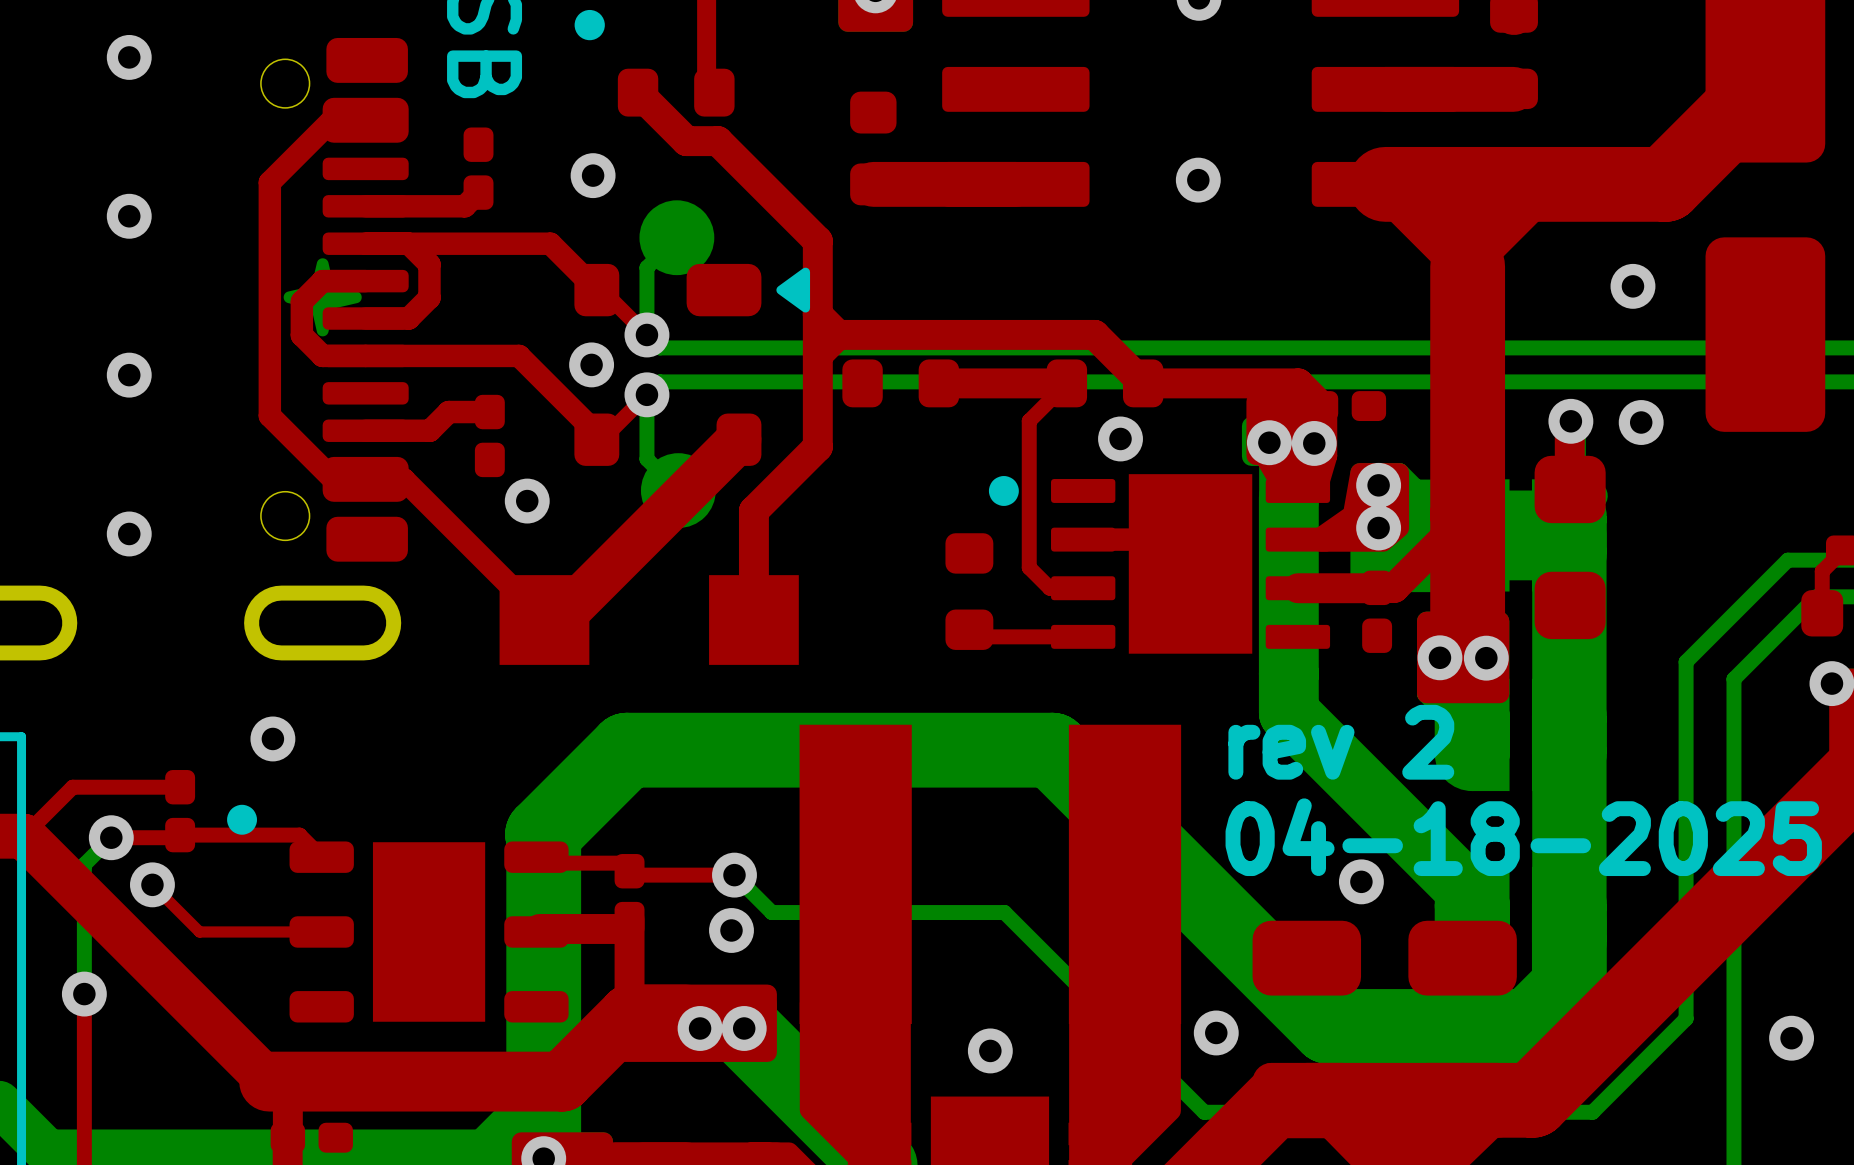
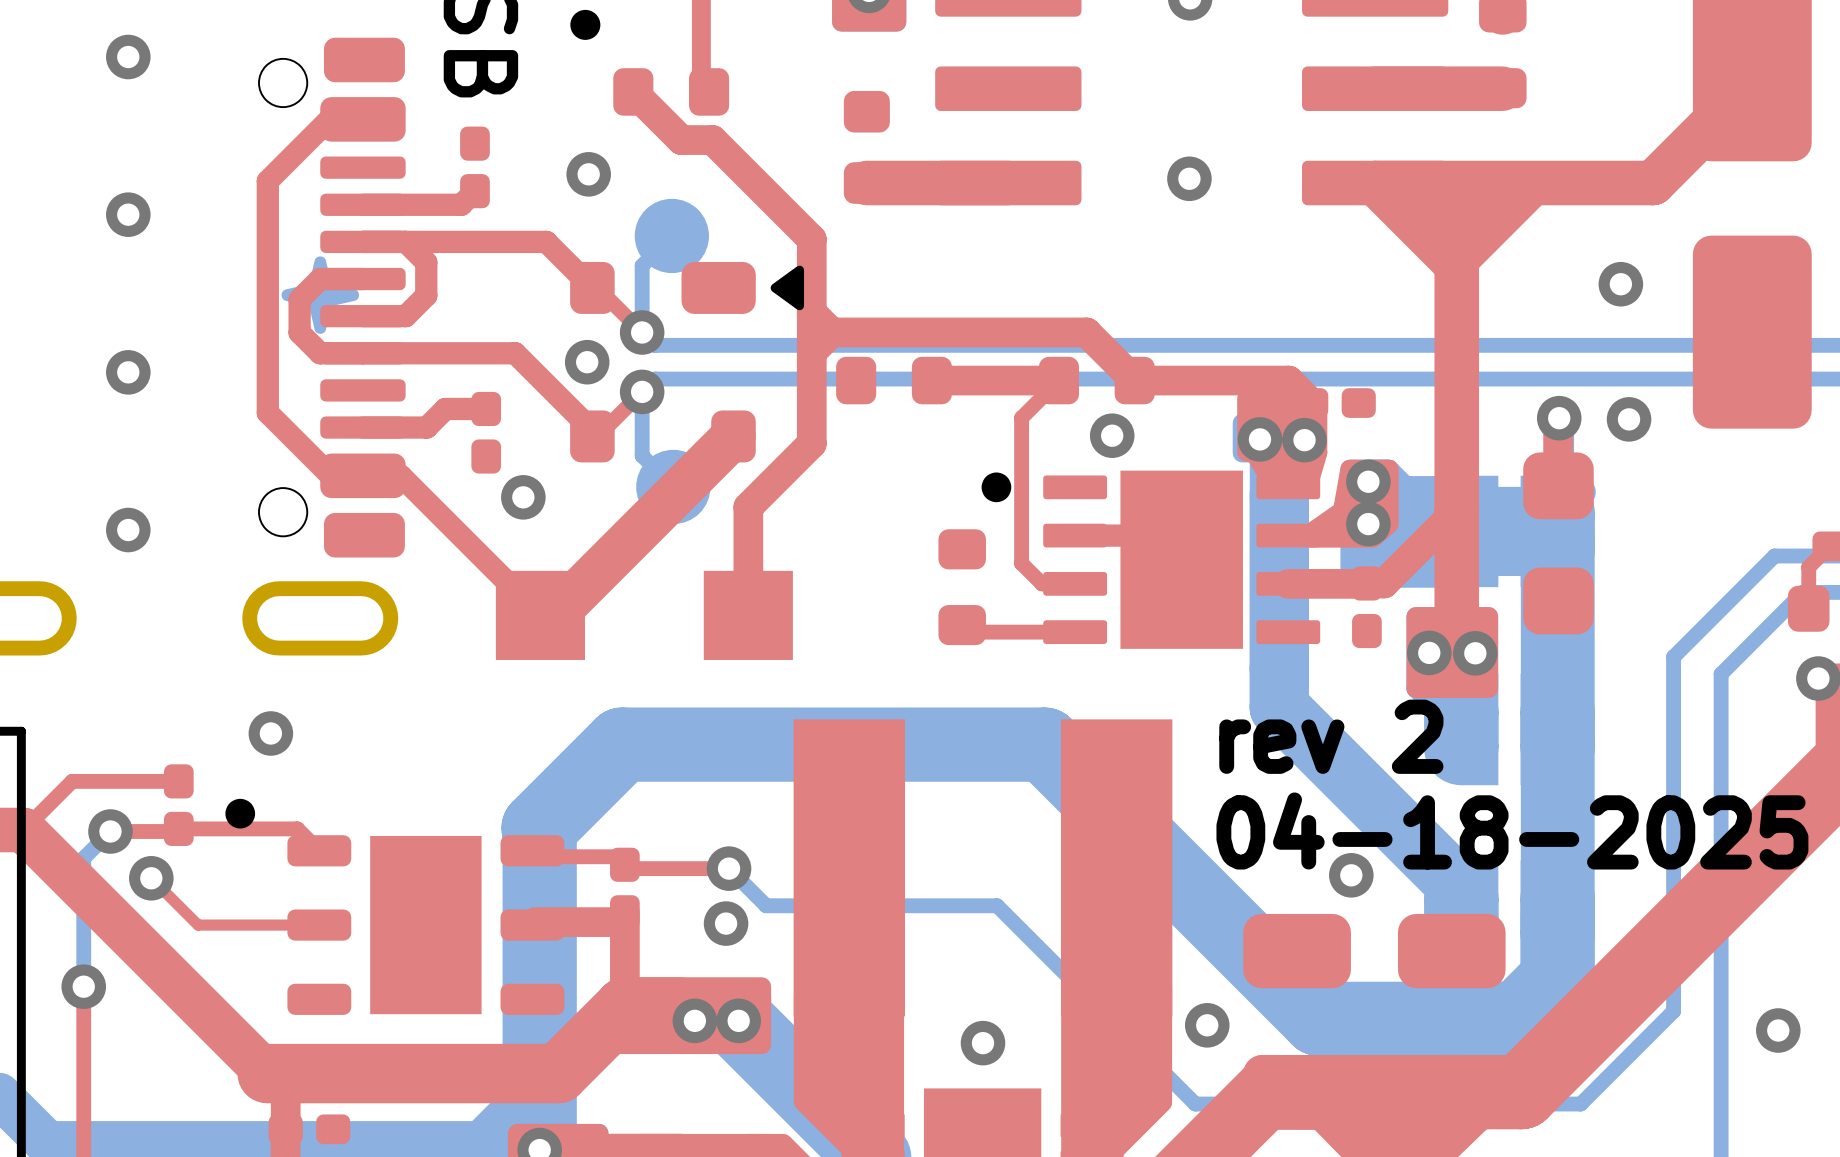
top track width: thick (1784, 65) (1665, 184) (1385, 184) -> thin (1770, 65) (1653, 183) (1375, 183)
top track width: thick (1467, 266) (1467, 652) -> thin (1456, 264) (1456, 648)

